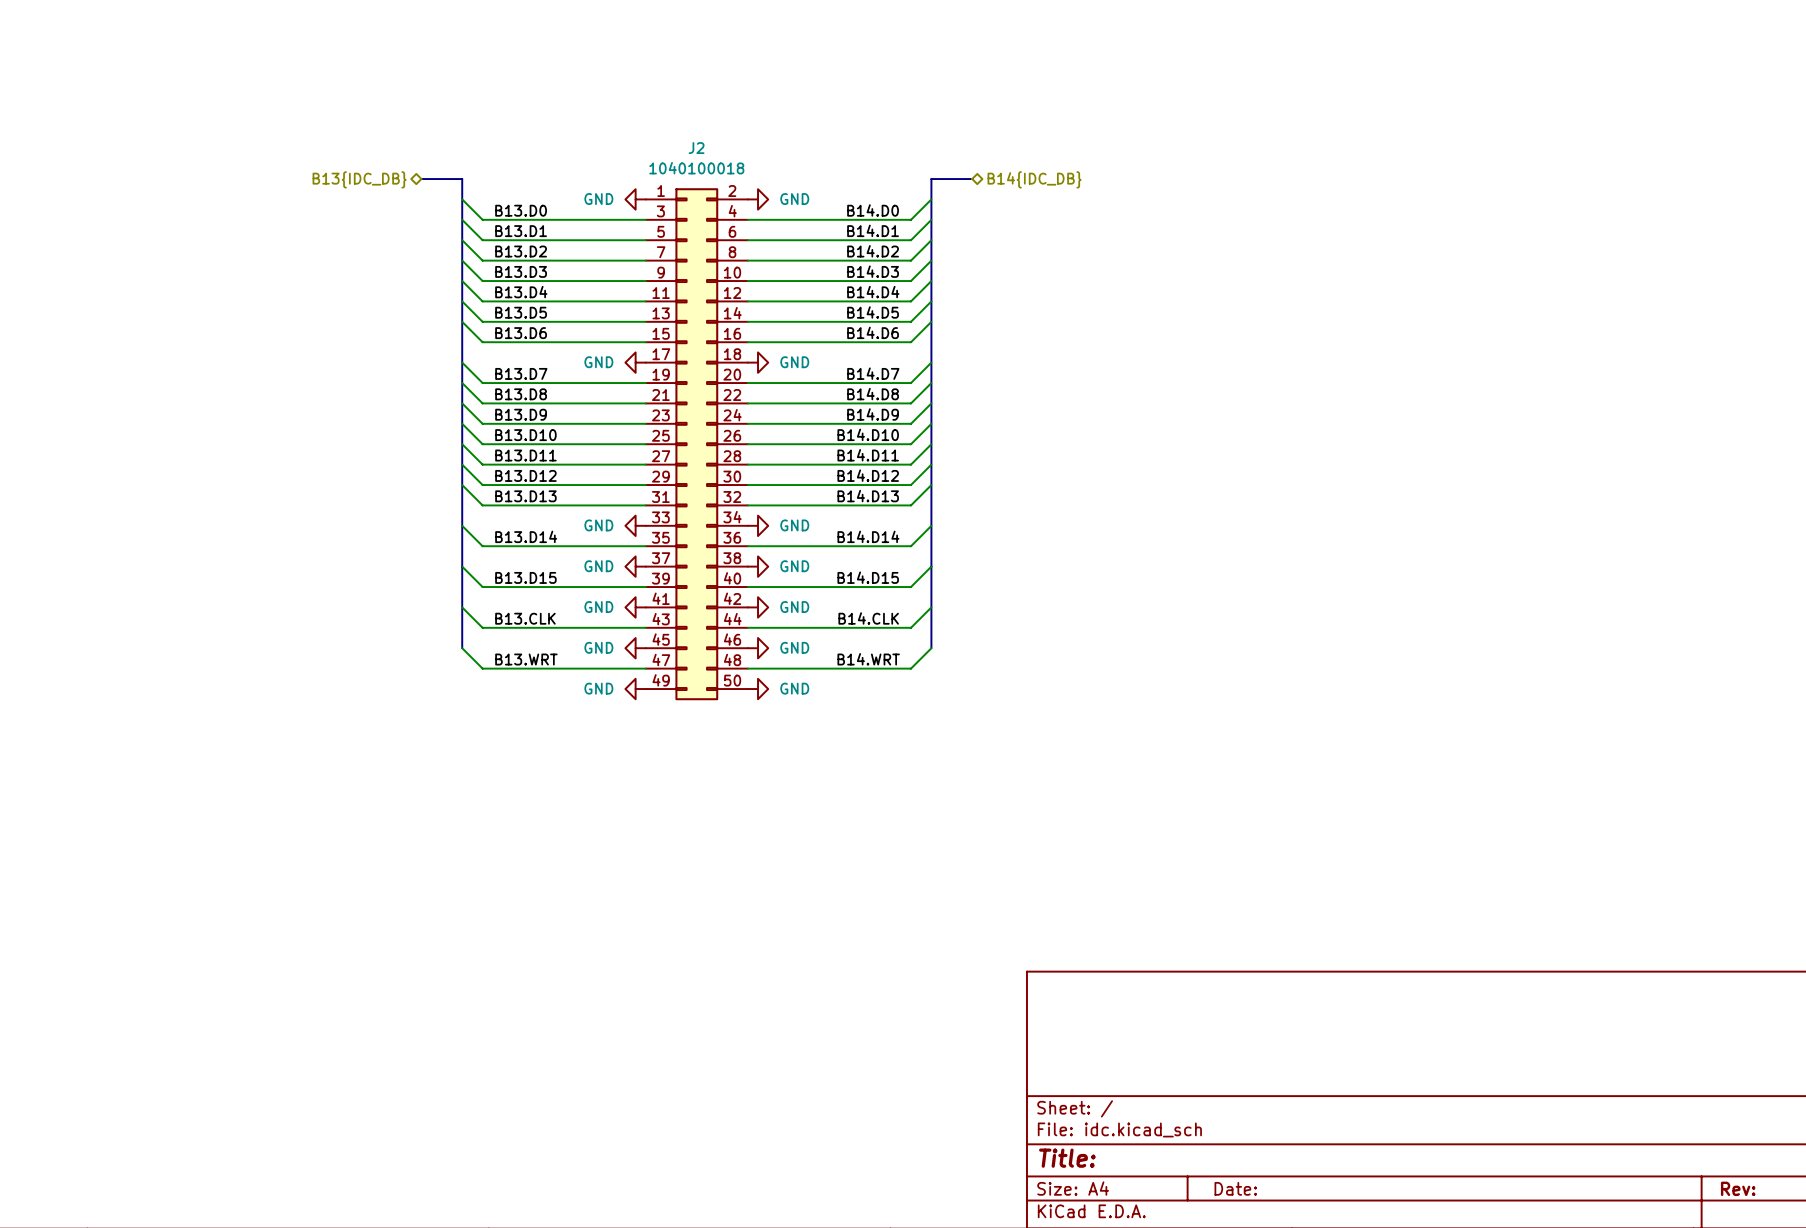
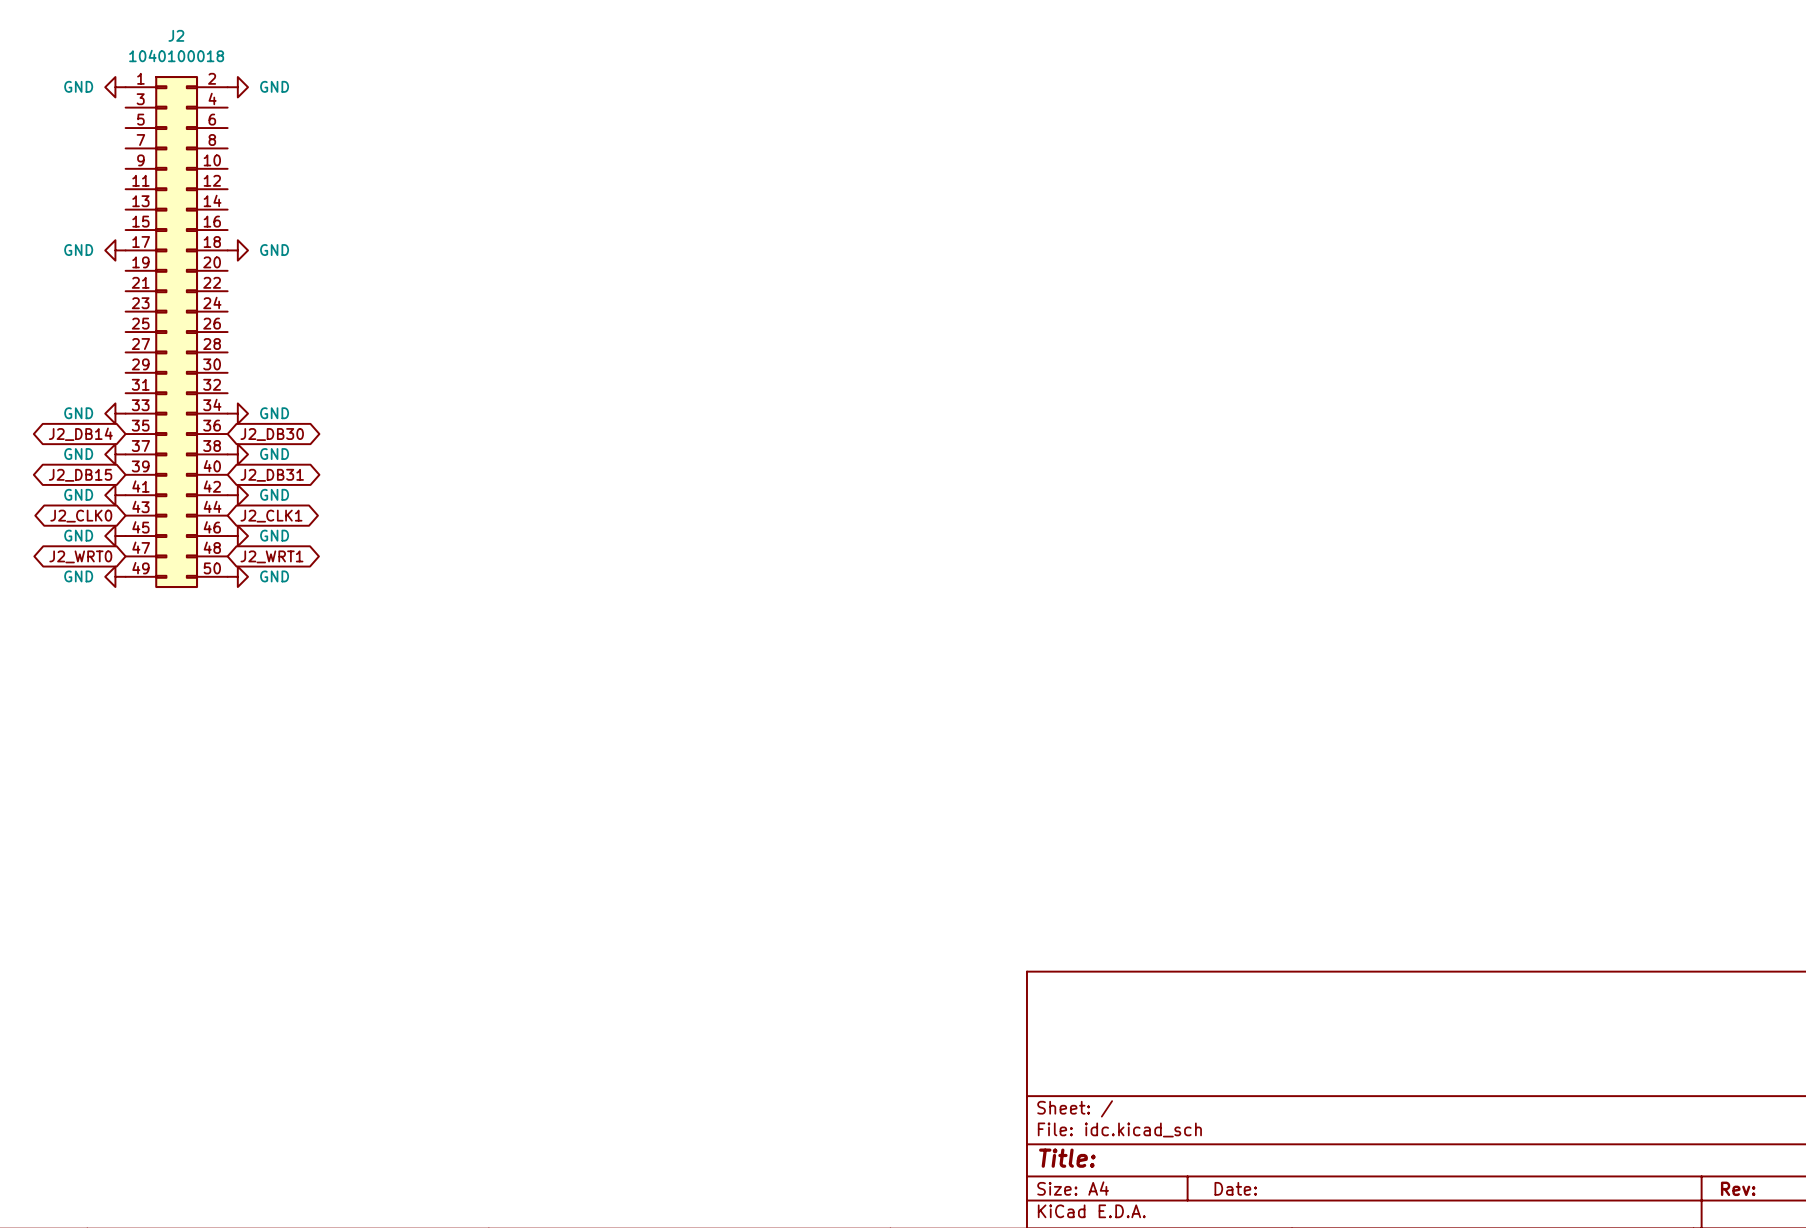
power symbol: none -> GND (115, 87)
power symbol: none -> GND (237, 87)
hierarchical label: B13{IDC_DB} (359, 179) -> none
bus: (421, 179) (462, 179) (462, 648) -> none
bus: (972, 179) (931, 179) (931, 648) -> none
hierarchical label: B14{IDC_DB} (1034, 179) -> none
wire: (462, 199) (482, 219) (645, 219) -> none
power symbol: GND (635, 199) -> none
power symbol: GND (758, 199) -> none
wire: (931, 199) (911, 219) (747, 219) -> none
label: B13.D0 (521, 210) -> none
label: B14.D0 (873, 210) -> none
wire: (462, 219) (482, 240) (645, 240) -> none
wire: (931, 219) (911, 240) (747, 240) -> none
label: B14.D1 (873, 230) -> none
label: B13.D1 (521, 231) -> none
wire: (462, 240) (482, 260) (645, 260) -> none
wire: (931, 240) (911, 260) (747, 260) -> none
power symbol: none -> GND (115, 250)
power symbol: none -> GND (237, 250)
label: B13.D2 (521, 251) -> none
label: B14.D2 (873, 251) -> none
wire: (462, 260) (482, 281) (645, 281) -> none
wire: (931, 260) (911, 281) (747, 281) -> none
label: B13.D3 (521, 271) -> none
label: B14.D3 (873, 271) -> none
wire: (462, 281) (482, 301) (645, 301) -> none
wire: (931, 281) (911, 301) (747, 301) -> none
label: B13.D4 (521, 292) -> none
label: B14.D4 (873, 292) -> none
wire: (462, 301) (482, 321) (645, 321) -> none
wire: (931, 301) (911, 321) (747, 321) -> none
label: B13.D5 (521, 312) -> none
label: B14.D5 (873, 312) -> none
wire: (462, 321) (482, 342) (645, 342) -> none
wire: (931, 321) (911, 342) (747, 342) -> none
label: B14.D6 (873, 332) -> none
label: B13.D6 (521, 333) -> none
wire: (462, 362) (482, 383) (645, 383) -> none
power symbol: GND (635, 362) -> none
power symbol: GND (758, 362) -> none
wire: (931, 362) (911, 383) (747, 383) -> none
label: B13.D7 (521, 373) -> none
label: B14.D7 (873, 373) -> none
wire: (462, 383) (482, 403) (645, 403) -> none
wire: (931, 383) (911, 403) (747, 403) -> none
label: B13.D8 (521, 394) -> none
label: B14.D8 (873, 394) -> none
wire: (462, 403) (482, 423) (645, 423) -> none
wire: (931, 403) (911, 423) (747, 423) -> none
power symbol: none -> GND (115, 413)
power symbol: none -> GND (237, 413)
label: B13.D9 (521, 414) -> none
label: B14.D9 (873, 414) -> none
wire: (462, 423) (482, 444) (645, 444) -> none
wire: (931, 423) (911, 444) (747, 444) -> none
global label: none -> J2_DB14 (80, 434)
global label: none -> J2_DB30 (272, 434)
label: B14.D10 (868, 434) -> none
label: B13.D10 (525, 435) -> none
wire: (462, 444) (482, 464) (645, 464) -> none
J2 position: (696, 444) -> (176, 332)
wire: (931, 444) (911, 464) (747, 464) -> none
power symbol: none -> GND (115, 454)
power symbol: none -> GND (237, 454)
label: B13.D11 (525, 455) -> none
label: B14.D11 (868, 455) -> none
wire: (462, 464) (482, 485) (645, 485) -> none
wire: (931, 464) (911, 485) (747, 485) -> none
global label: none -> J2_DB15 (80, 475)
global label: none -> J2_DB31 (272, 475)
label: B13.D12 (525, 475) -> none
label: B14.D12 (868, 475) -> none
wire: (462, 485) (482, 505) (645, 505) -> none
wire: (931, 485) (911, 505) (747, 505) -> none
power symbol: none -> GND (115, 495)
power symbol: none -> GND (237, 495)
label: B13.D13 (525, 496) -> none
label: B14.D13 (868, 496) -> none
global label: none -> J2_CLK0 (81, 516)
global label: none -> J2_CLK1 (271, 516)
wire: (462, 525) (482, 546) (645, 546) -> none
power symbol: GND (635, 525) -> none
power symbol: GND (758, 525) -> none
wire: (931, 525) (911, 546) (747, 546) -> none
power symbol: none -> GND (115, 536)
power symbol: none -> GND (237, 536)
label: B13.D14 (526, 536) -> none
label: B14.D14 (868, 536) -> none
global label: none -> J2_WRT0 (80, 556)
global label: none -> J2_WRT1 (271, 556)
wire: (462, 566) (482, 587) (645, 587) -> none
power symbol: GND (635, 566) -> none
power symbol: GND (758, 566) -> none
wire: (931, 566) (911, 587) (747, 587) -> none
power symbol: none -> GND (115, 576)
power symbol: none -> GND (237, 576)
label: B13.D15 (525, 577) -> none
label: B14.D15 (868, 577) -> none
wire: (462, 607) (482, 627) (645, 627) -> none
power symbol: GND (635, 607) -> none
power symbol: GND (758, 607) -> none
wire: (931, 607) (911, 627) (747, 627) -> none
label: B13.CLK (525, 618) -> none
label: B14.CLK (868, 618) -> none
wire: (462, 648) (482, 668) (645, 668) -> none
power symbol: GND (635, 648) -> none
power symbol: GND (758, 648) -> none
wire: (931, 648) (911, 668) (747, 668) -> none
label: B13.WRT (526, 659) -> none
label: B14.WRT (868, 659) -> none
power symbol: GND (635, 689) -> none
power symbol: GND (758, 689) -> none

